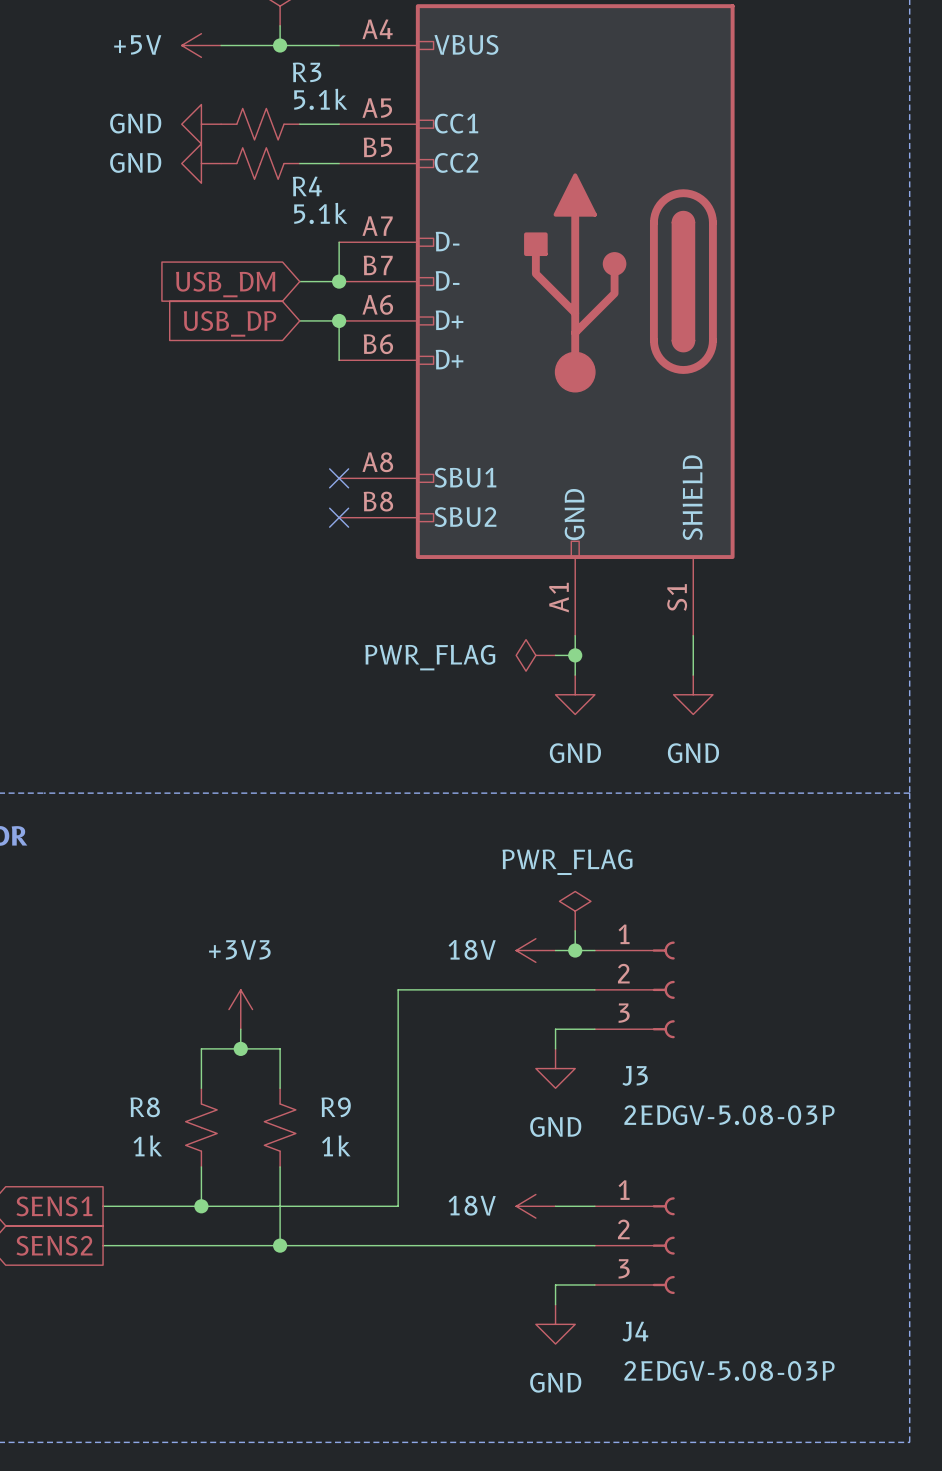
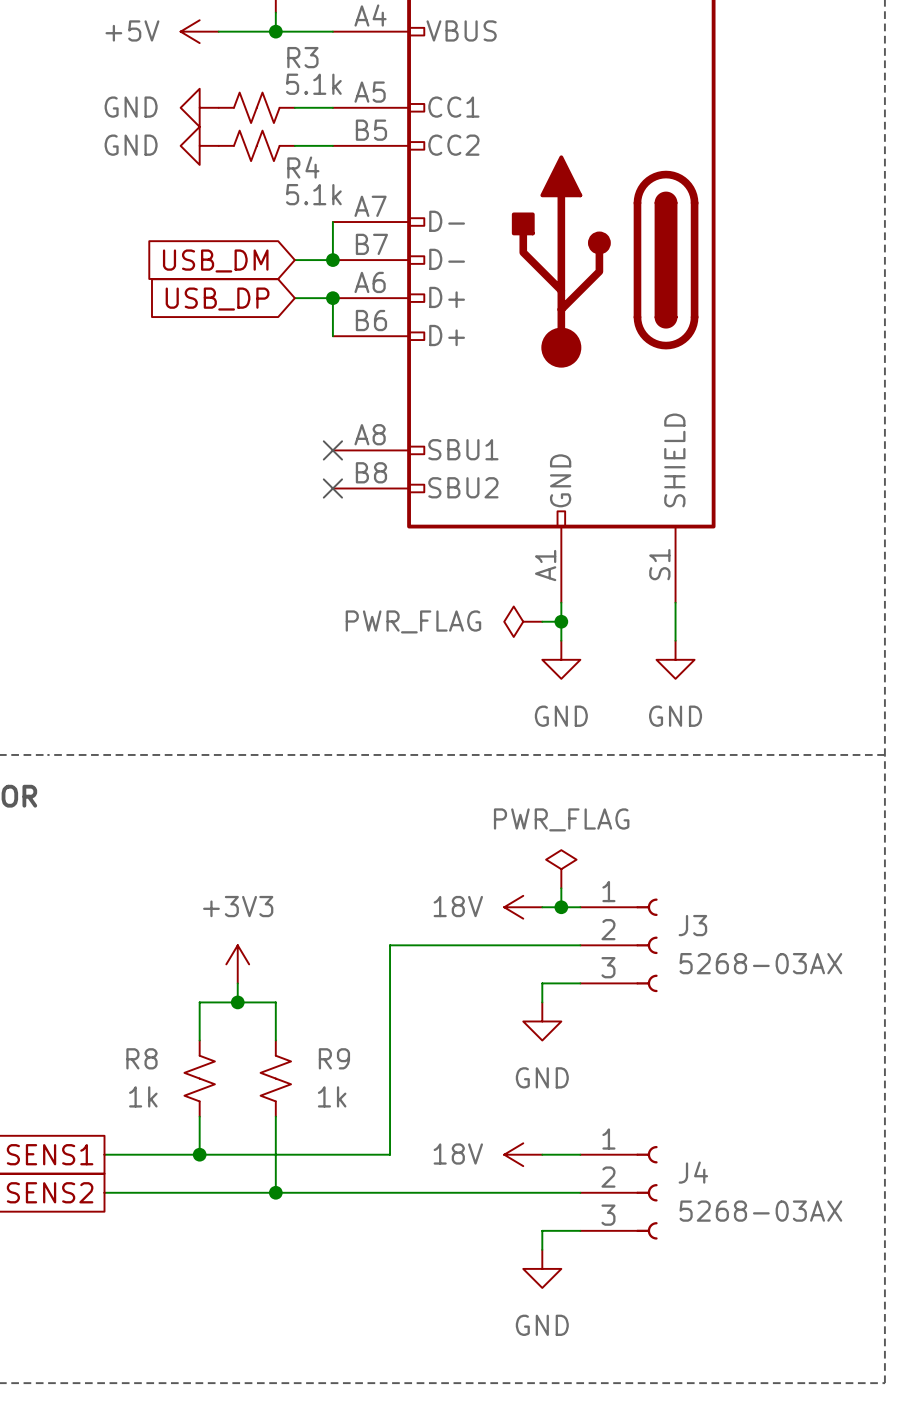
J3 name position: J3 (635, 1075) -> J3 (692, 925)
J3 value: 2EDGV-5.08-03P (729, 1115) -> 5268-03AX (760, 963)
J4 name position: J4 (635, 1331) -> J4 (693, 1172)
J4 value: 2EDGV-5.08-03P (729, 1370) -> 5268-03AX (760, 1211)

